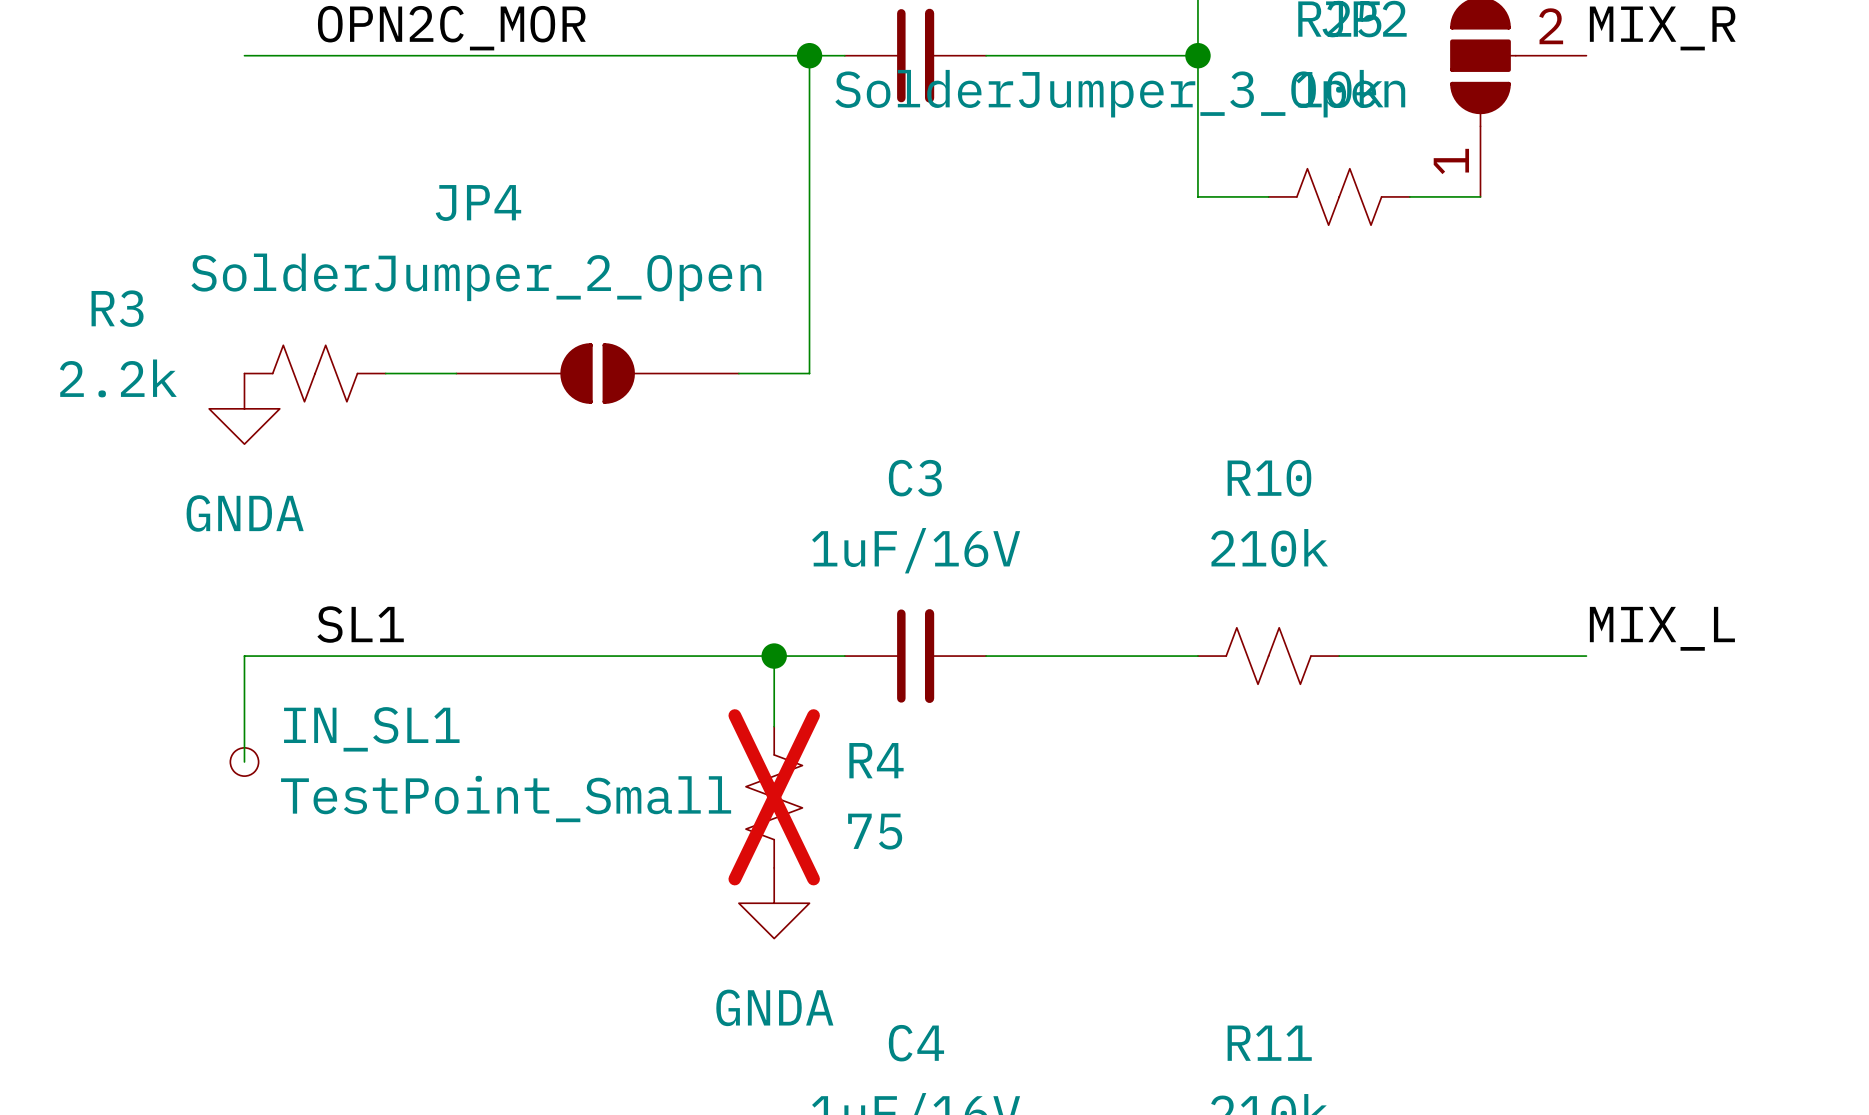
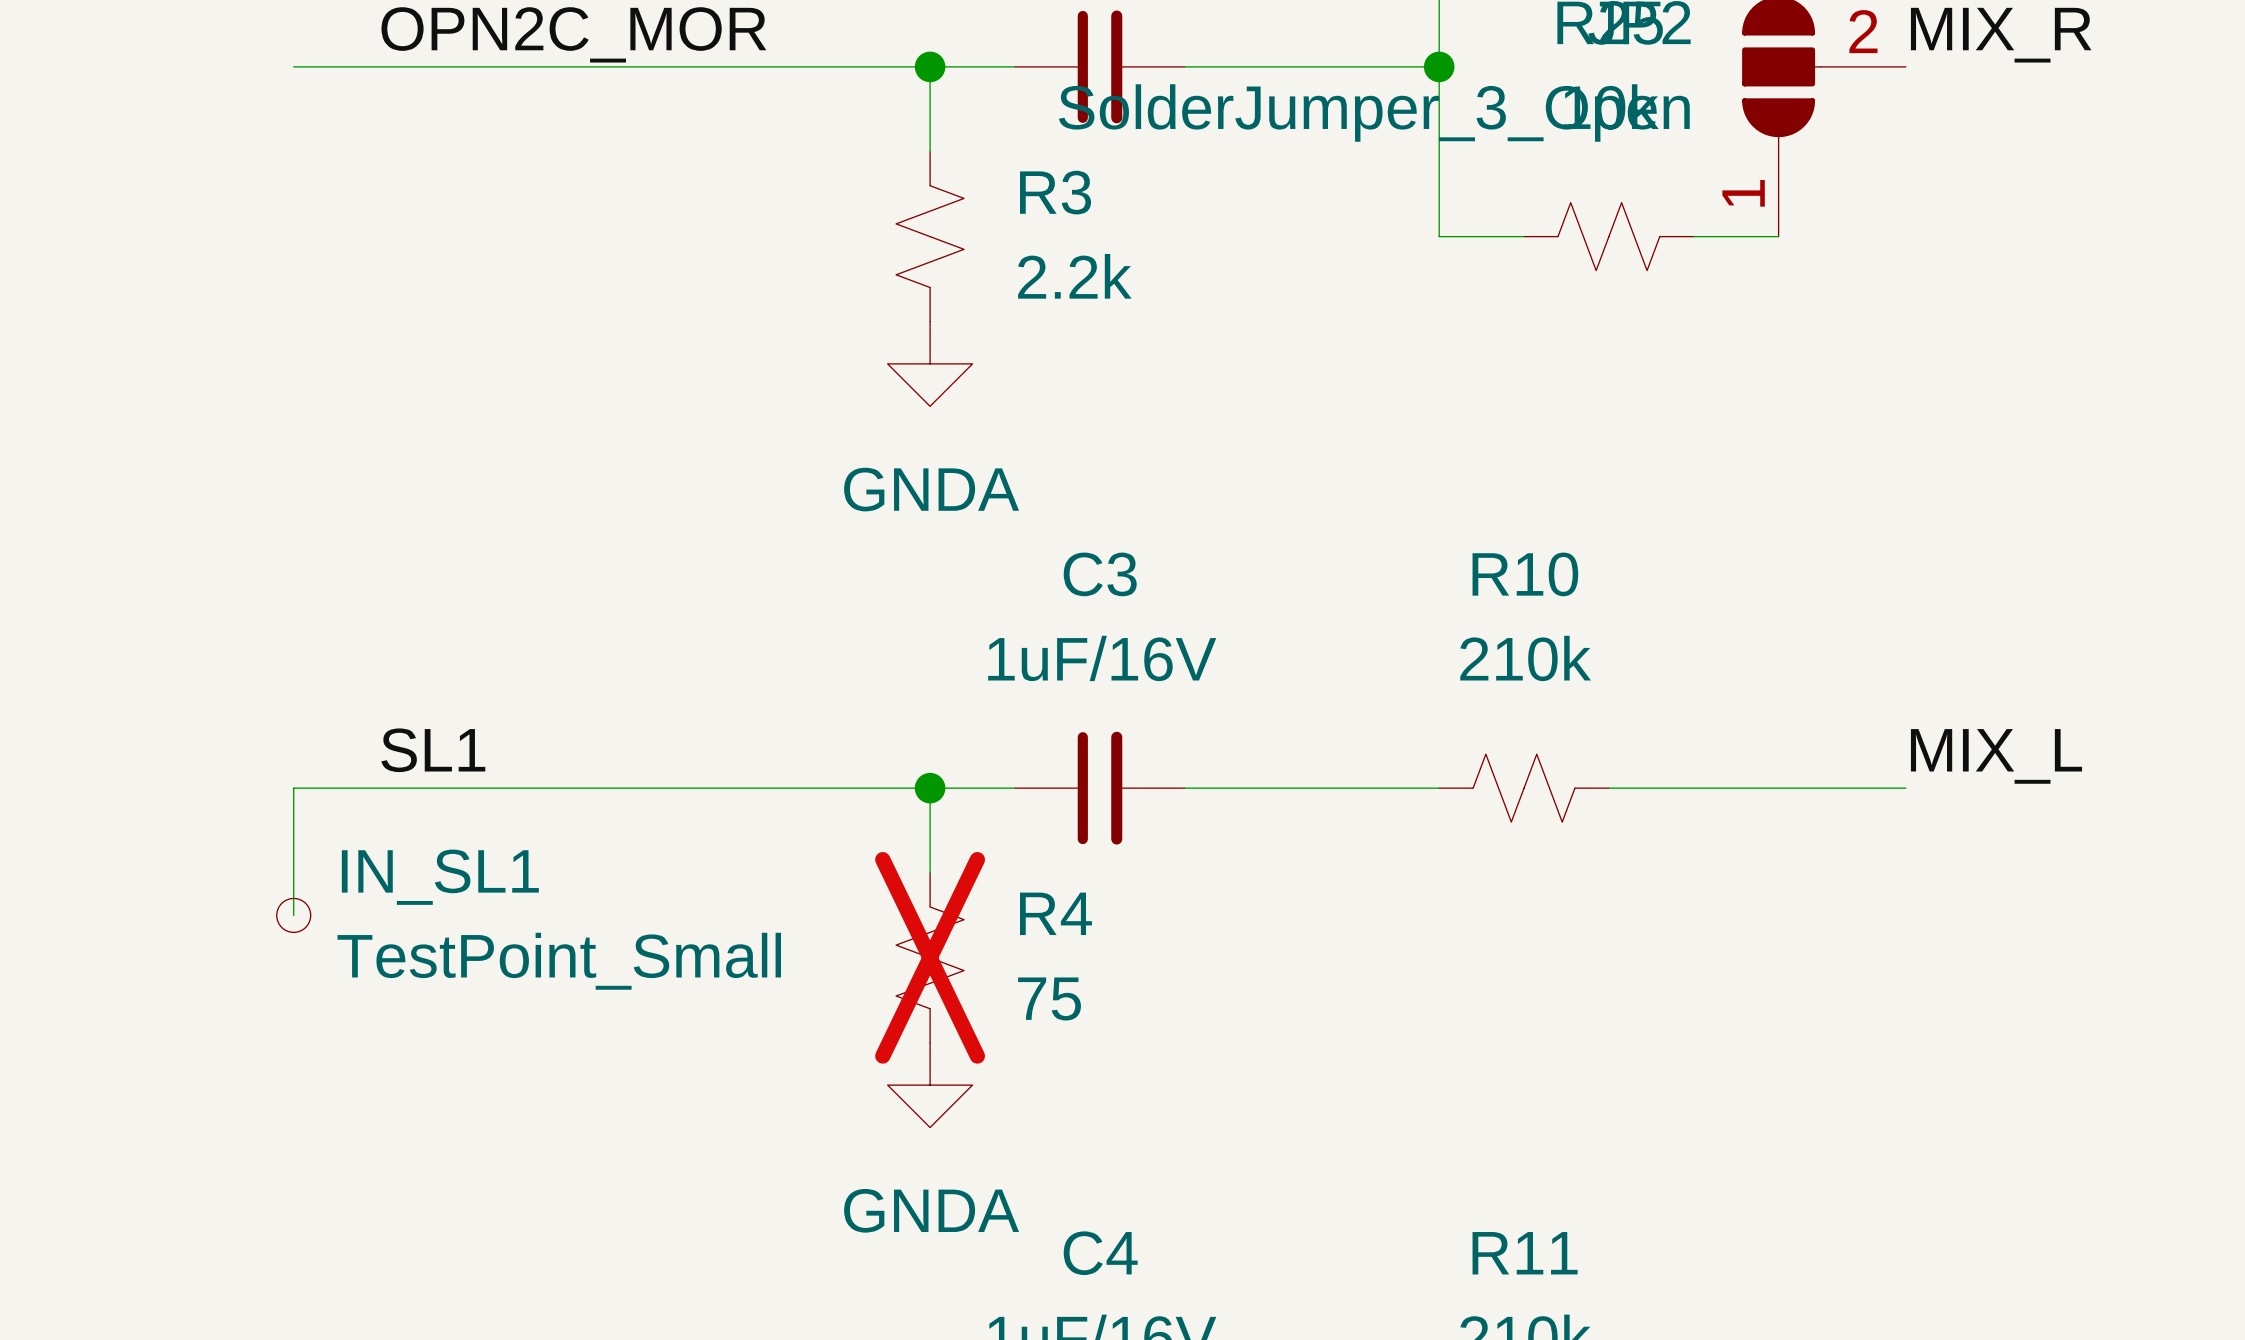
wire: none -> (930, 66) (930, 151)
wire: (809, 55) (809, 373) (738, 373) -> none
junction position: (809, 55) -> (930, 66)
R3 name position: R3 (117, 308) -> R3 (1055, 192)
R3 rotation: 0° (315, 373) -> 90° clockwise (930, 236)
R3 position: (315, 373) -> (930, 236)
wire: (385, 373) (456, 373) -> none
JP4: SolderJumper_2_Open (597, 373) -> none
R3 value position: 2.2k (118, 378) -> 2.2k (1074, 276)
power symbol position: GNDA (244, 408) -> GNDA (930, 363)

